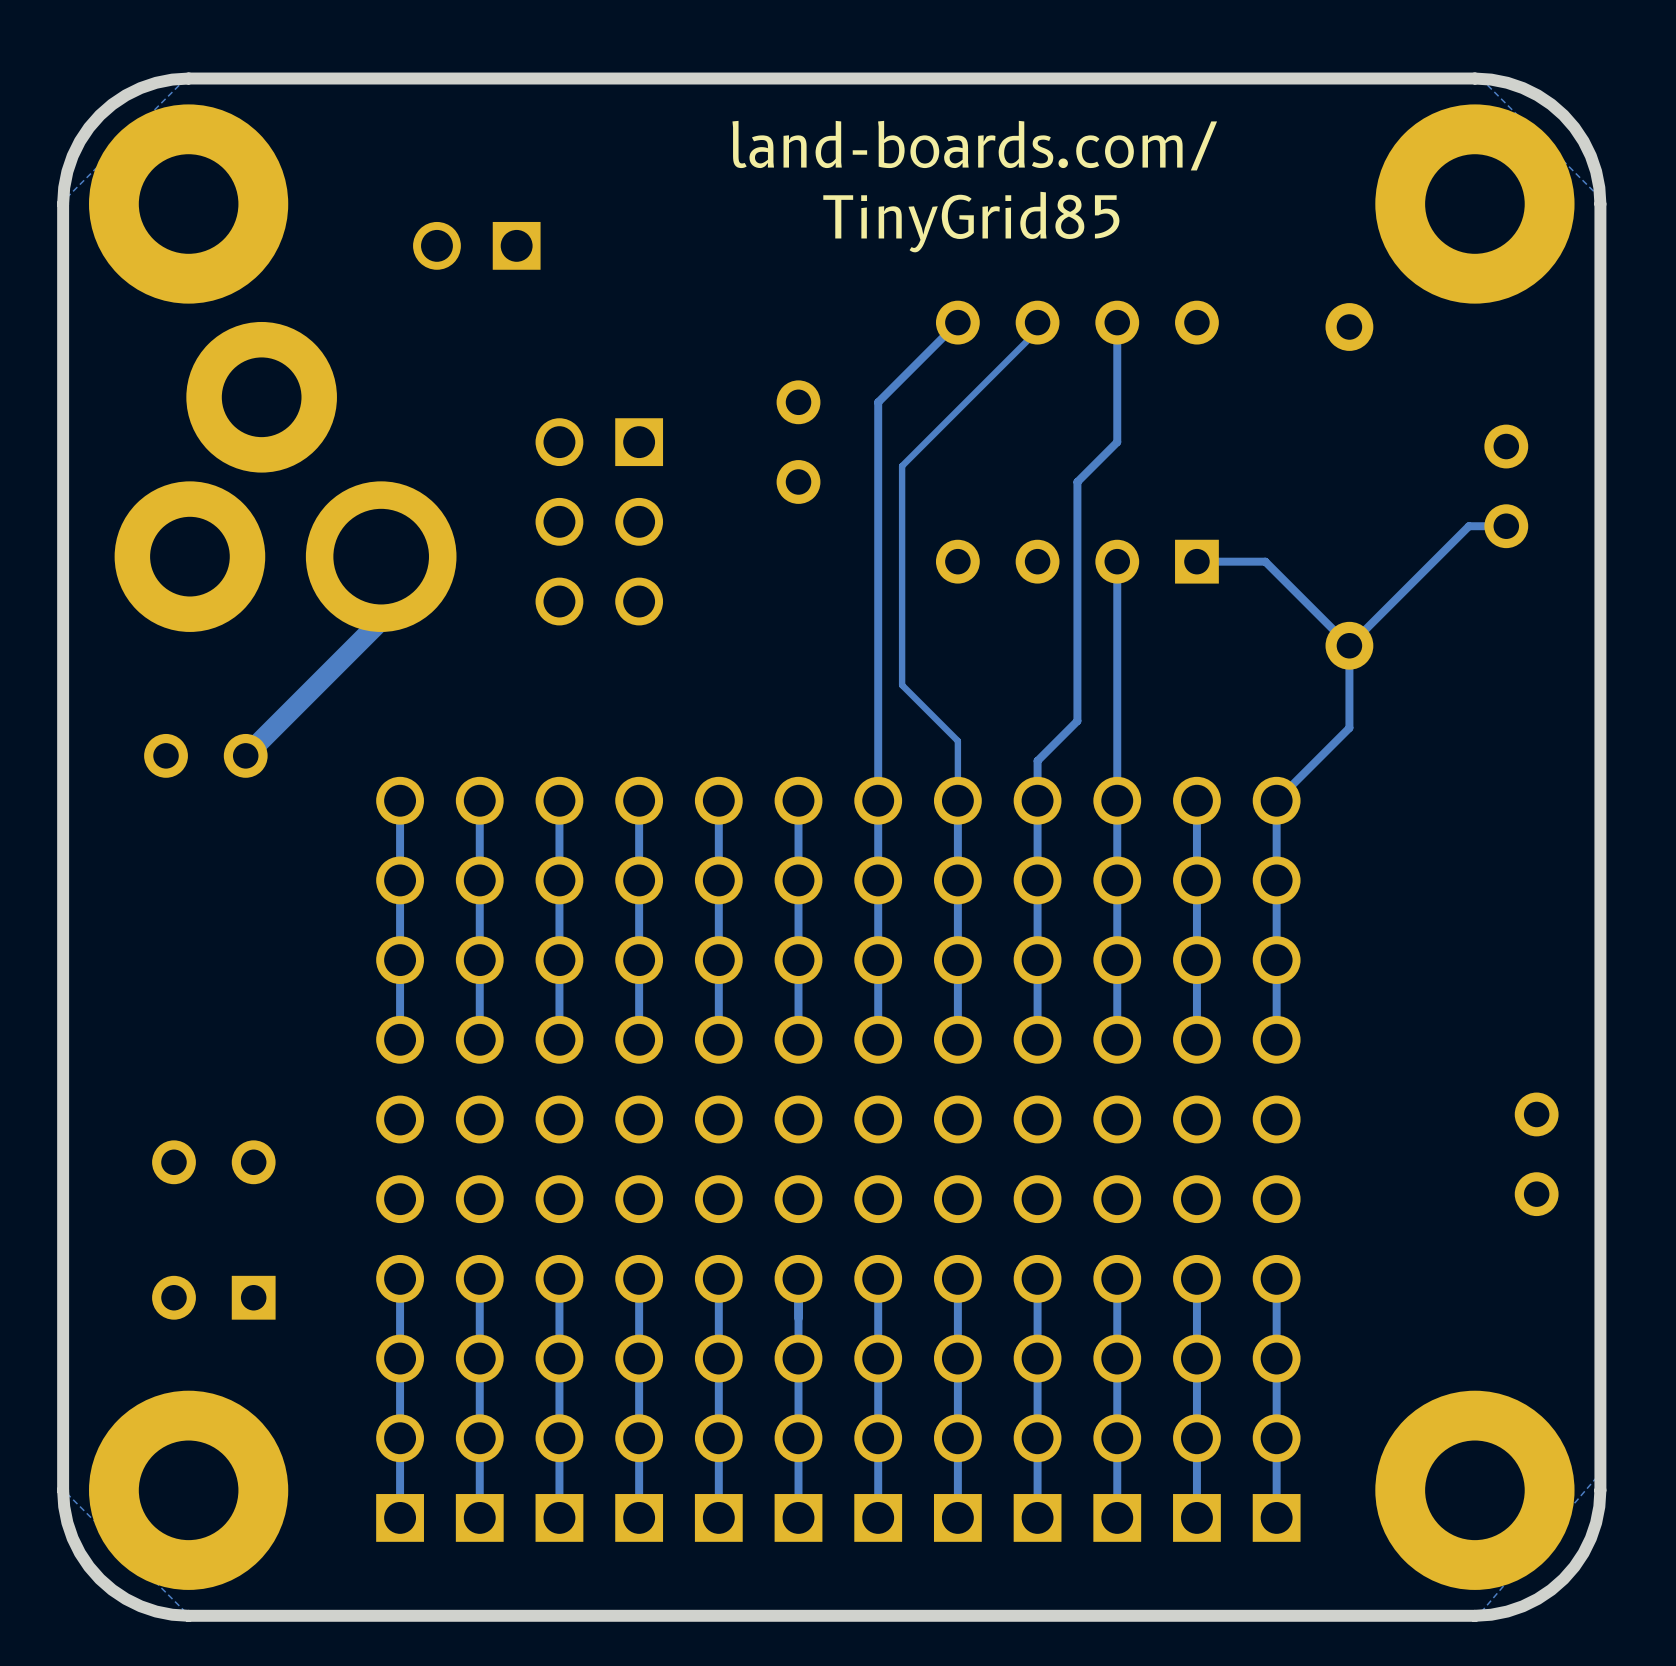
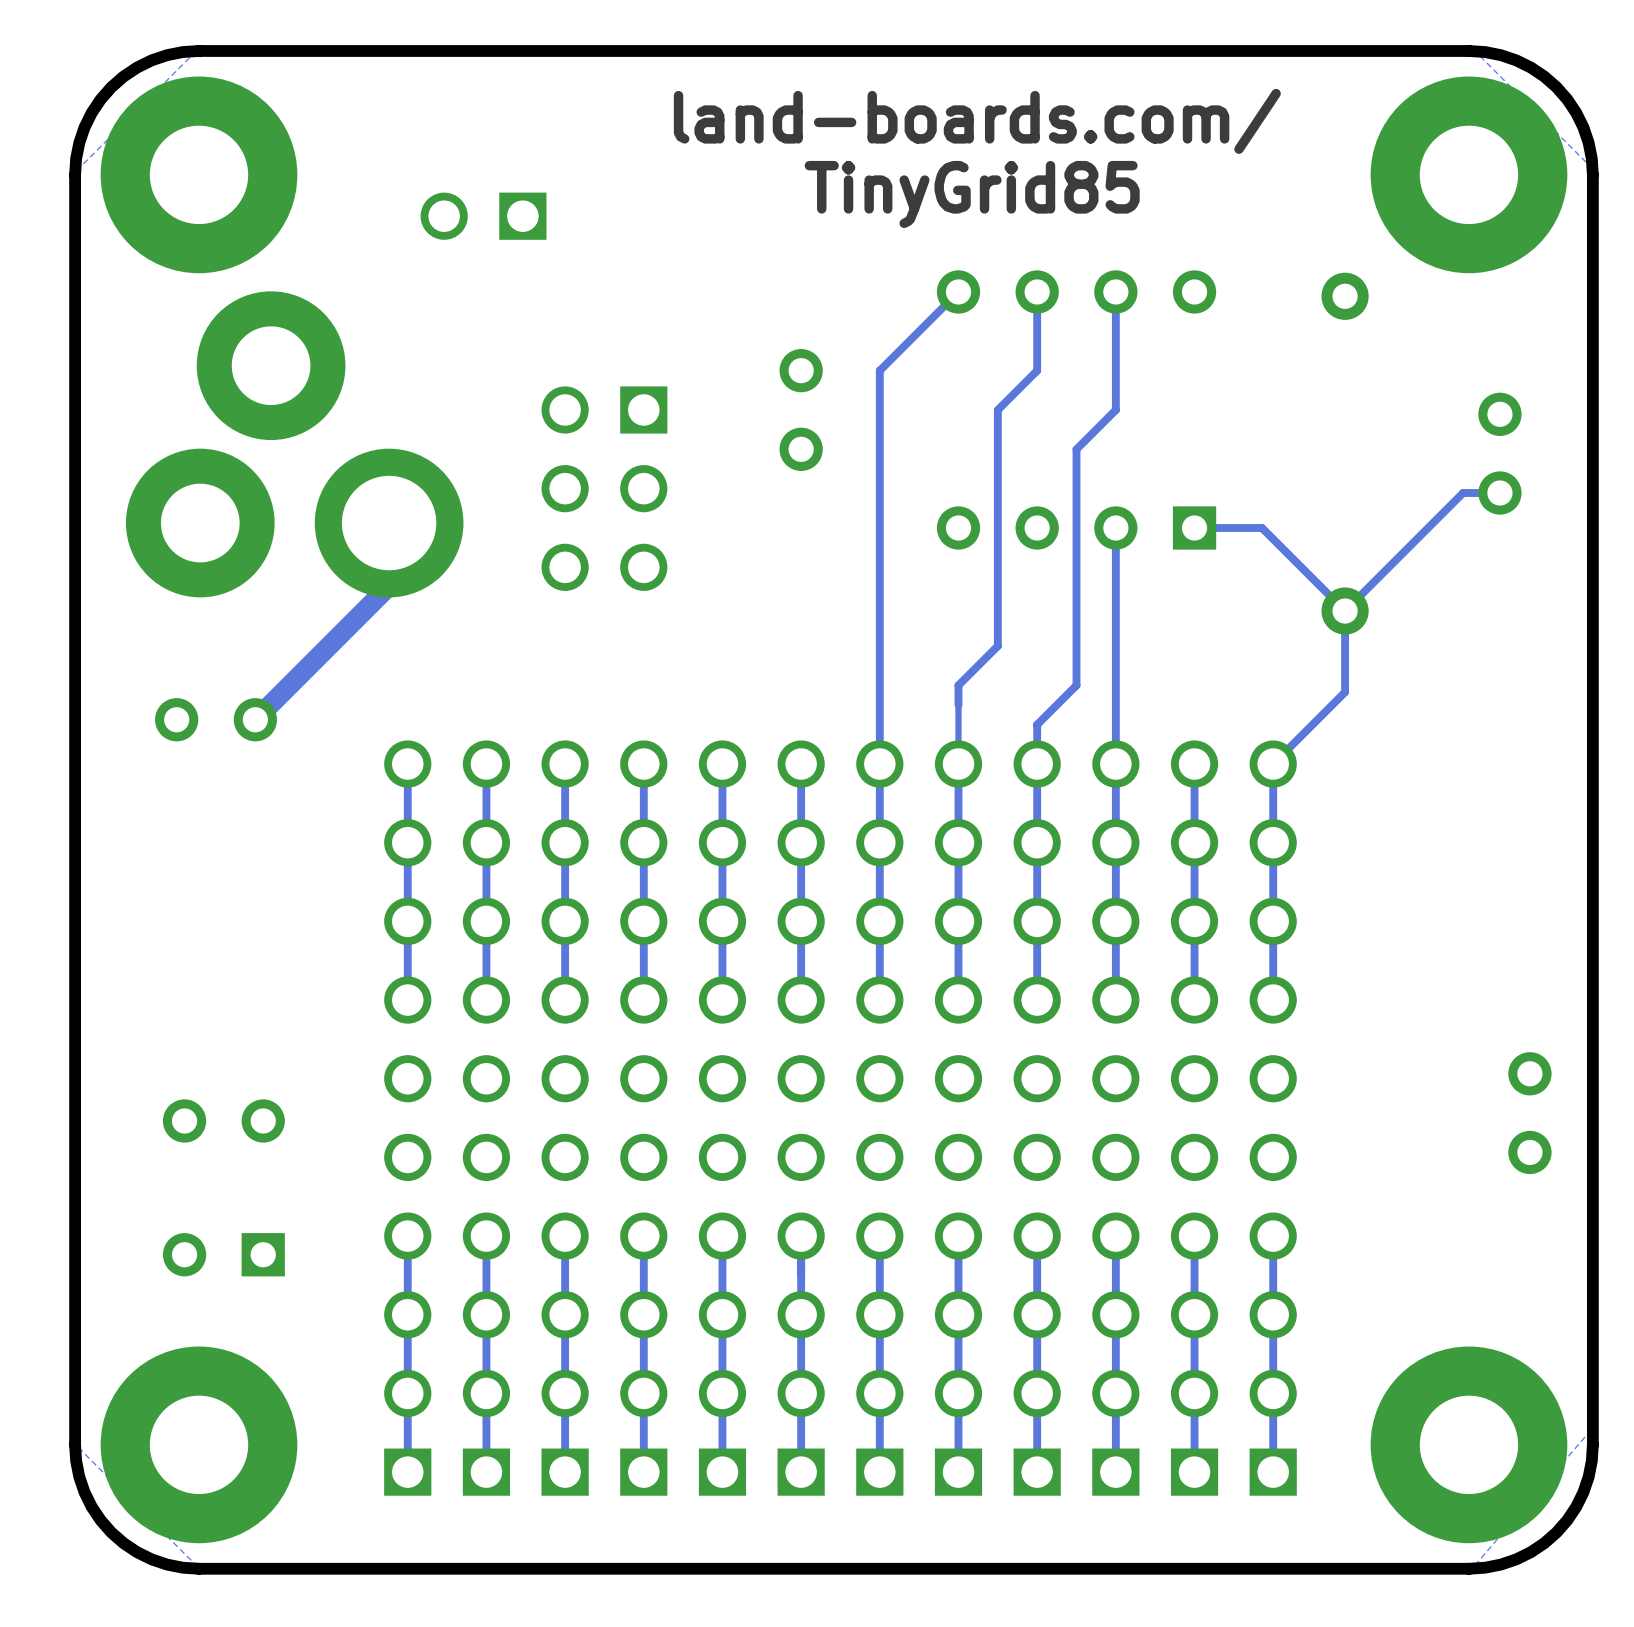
track: (1037, 330) (902, 466) (902, 685) (957, 740) -> (1037, 299) (1037, 370) (997, 409) (997, 646) (958, 685) (958, 705)

